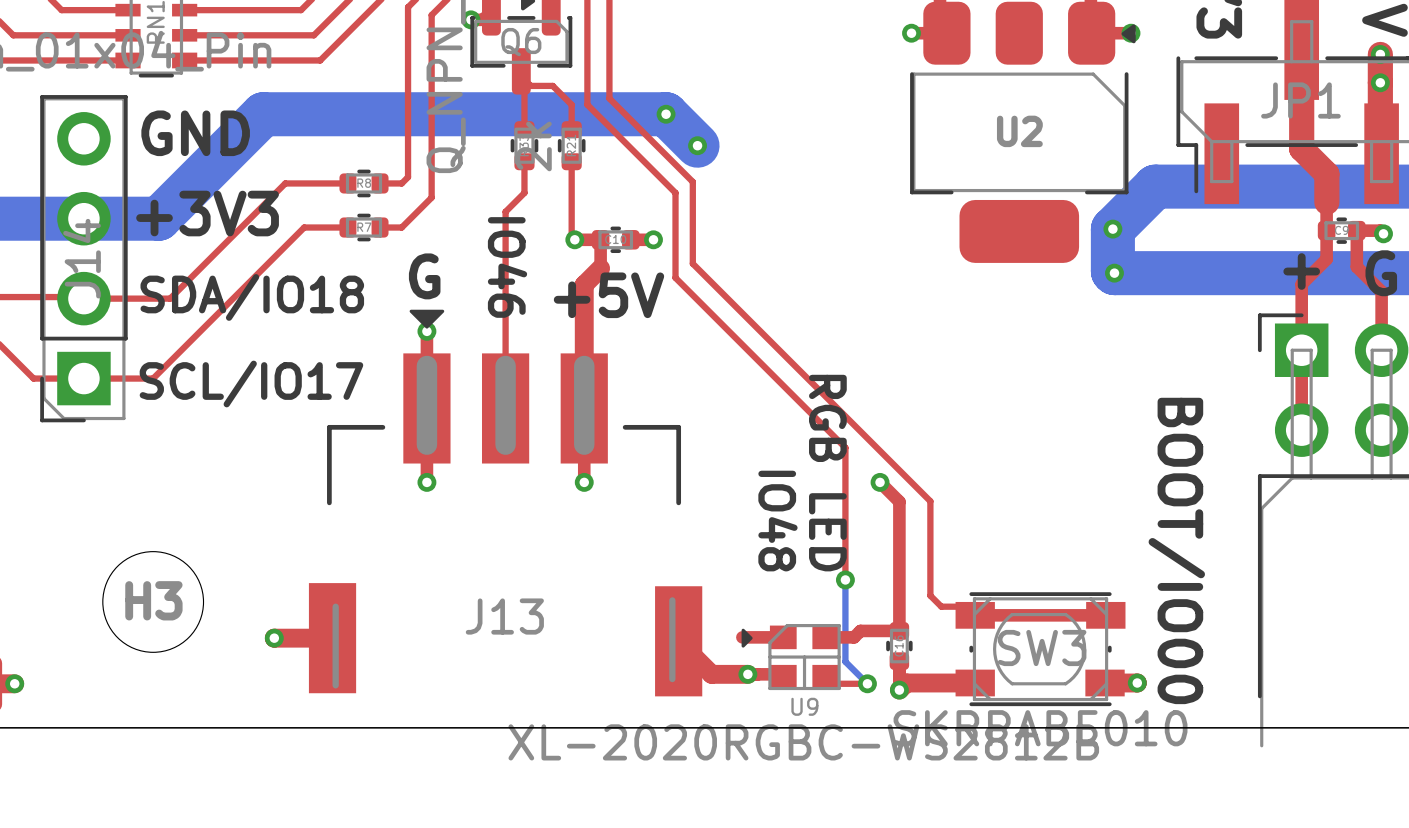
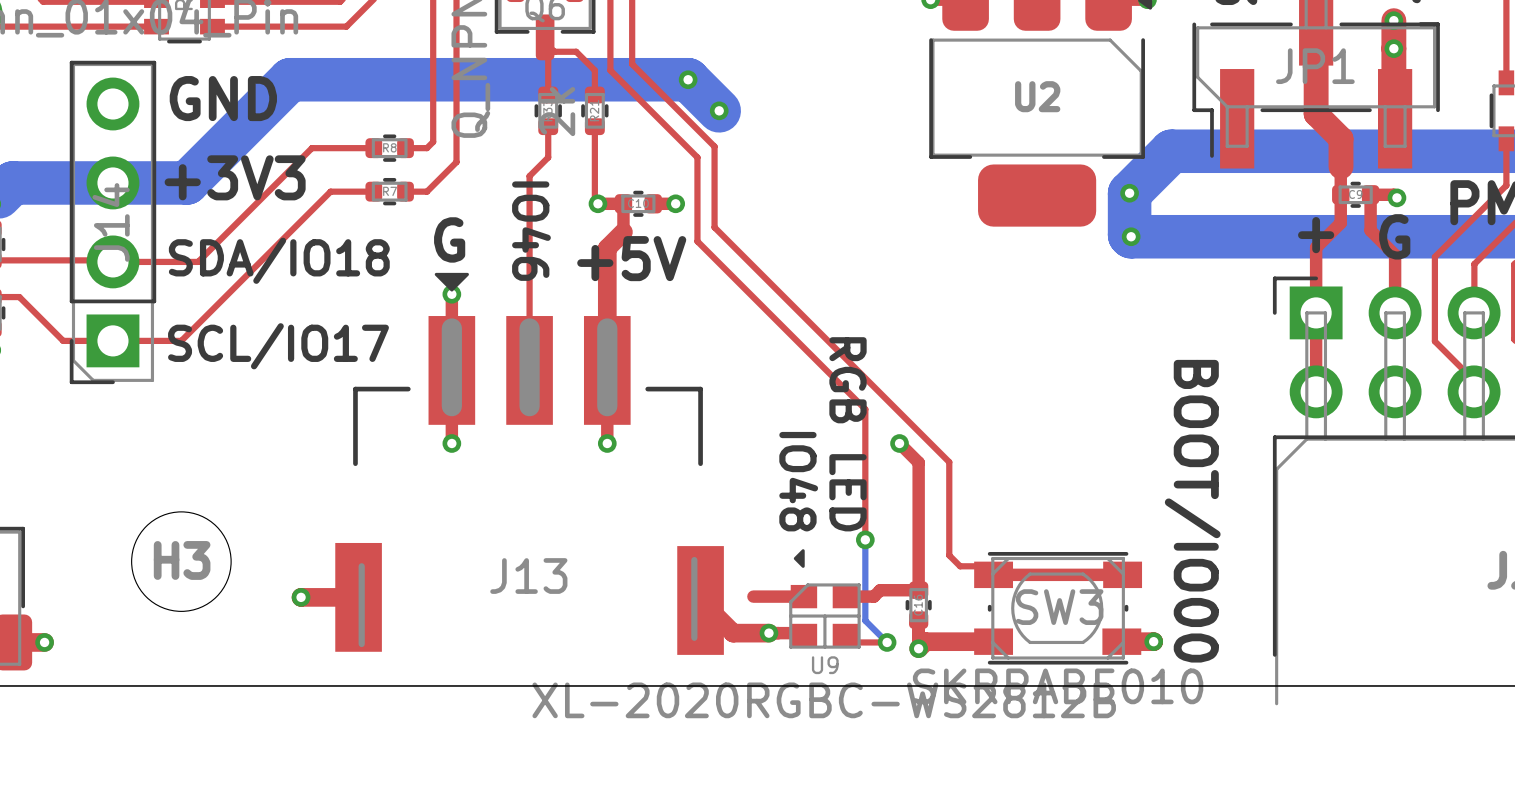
U9 footprint: [741, 624, 841, 691] -> [789, 549, 861, 649]
top track: none -> (753, 596) (763, 596)

